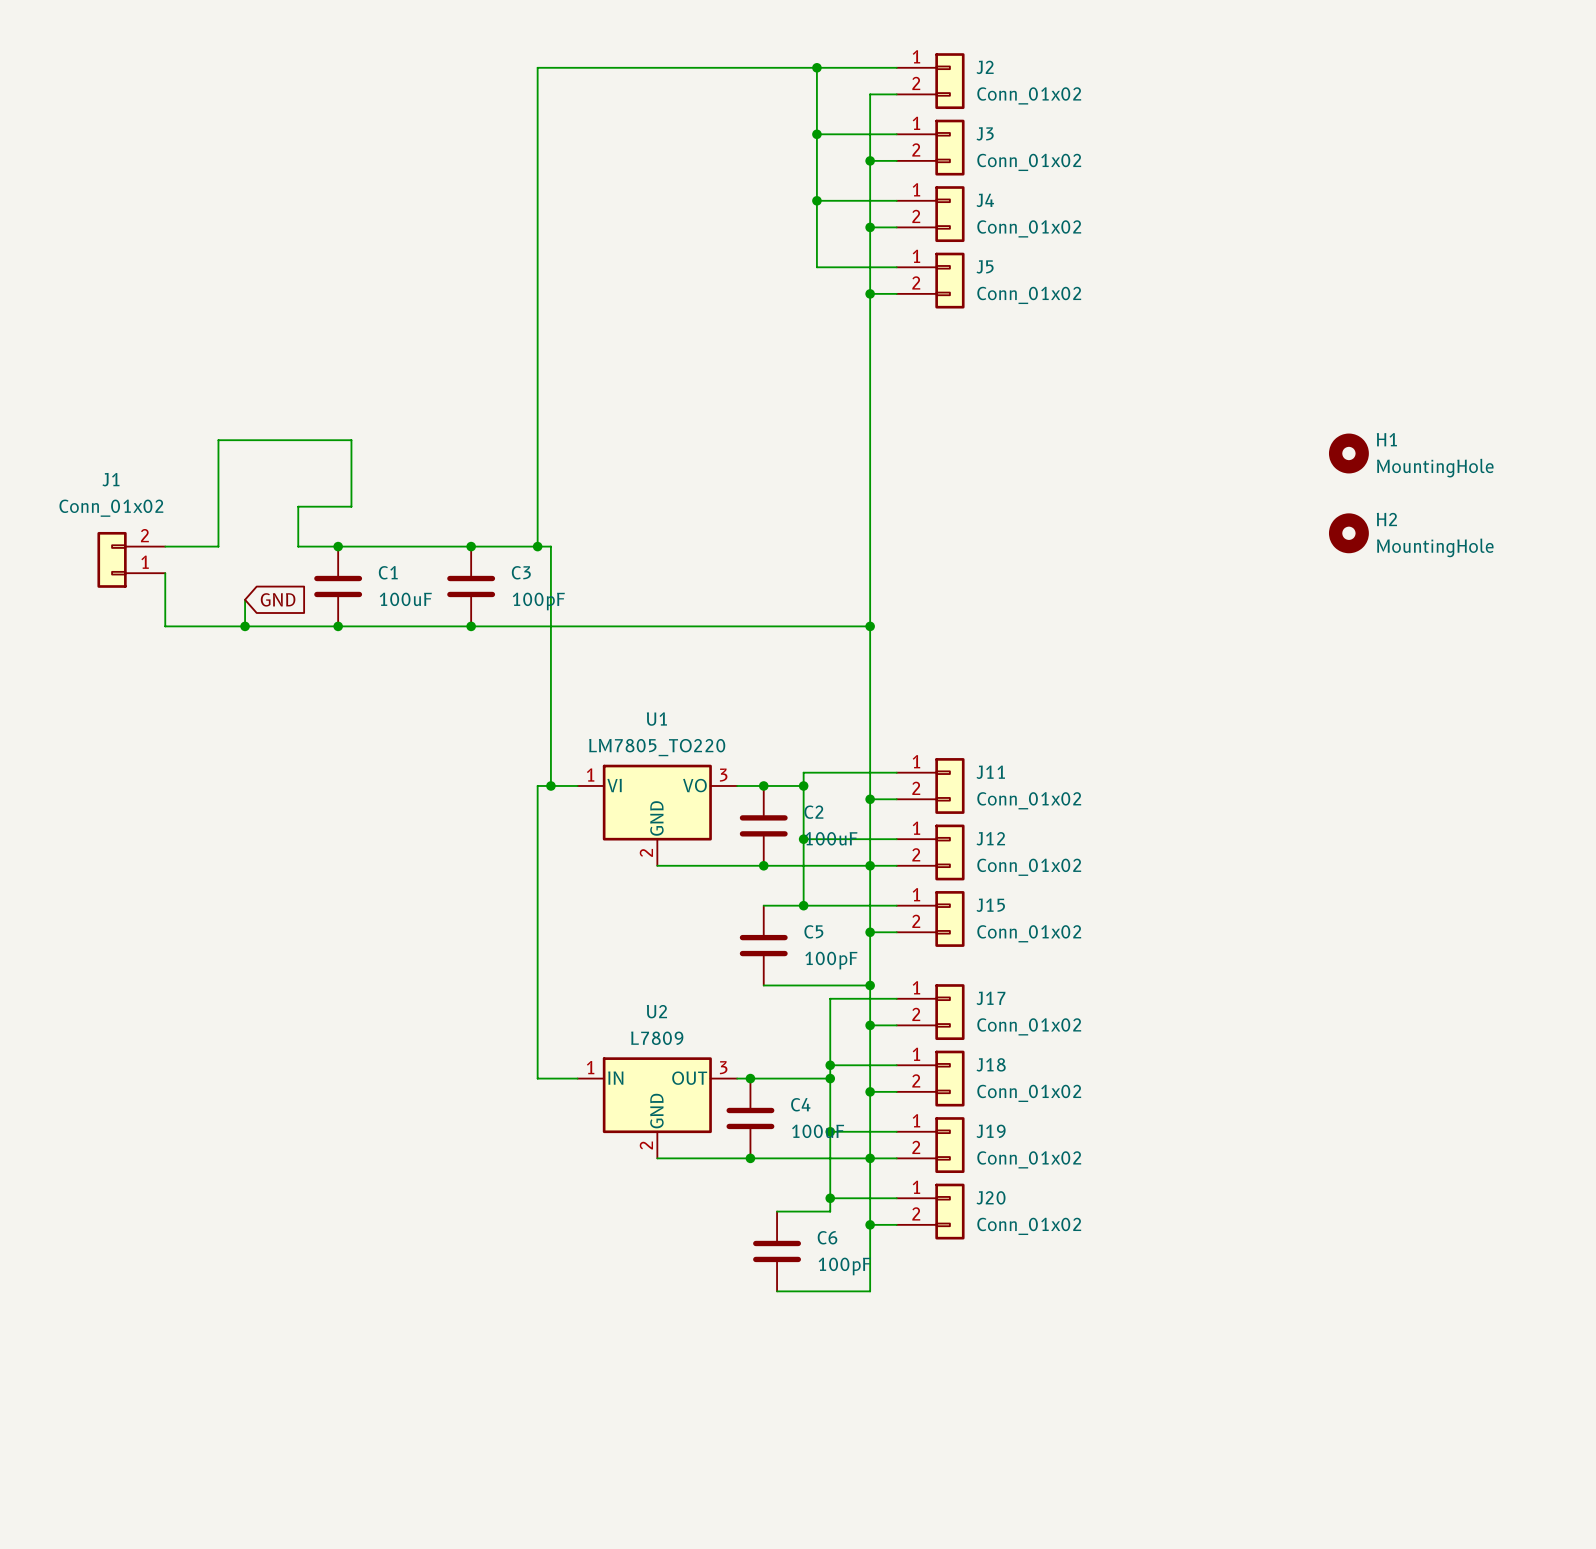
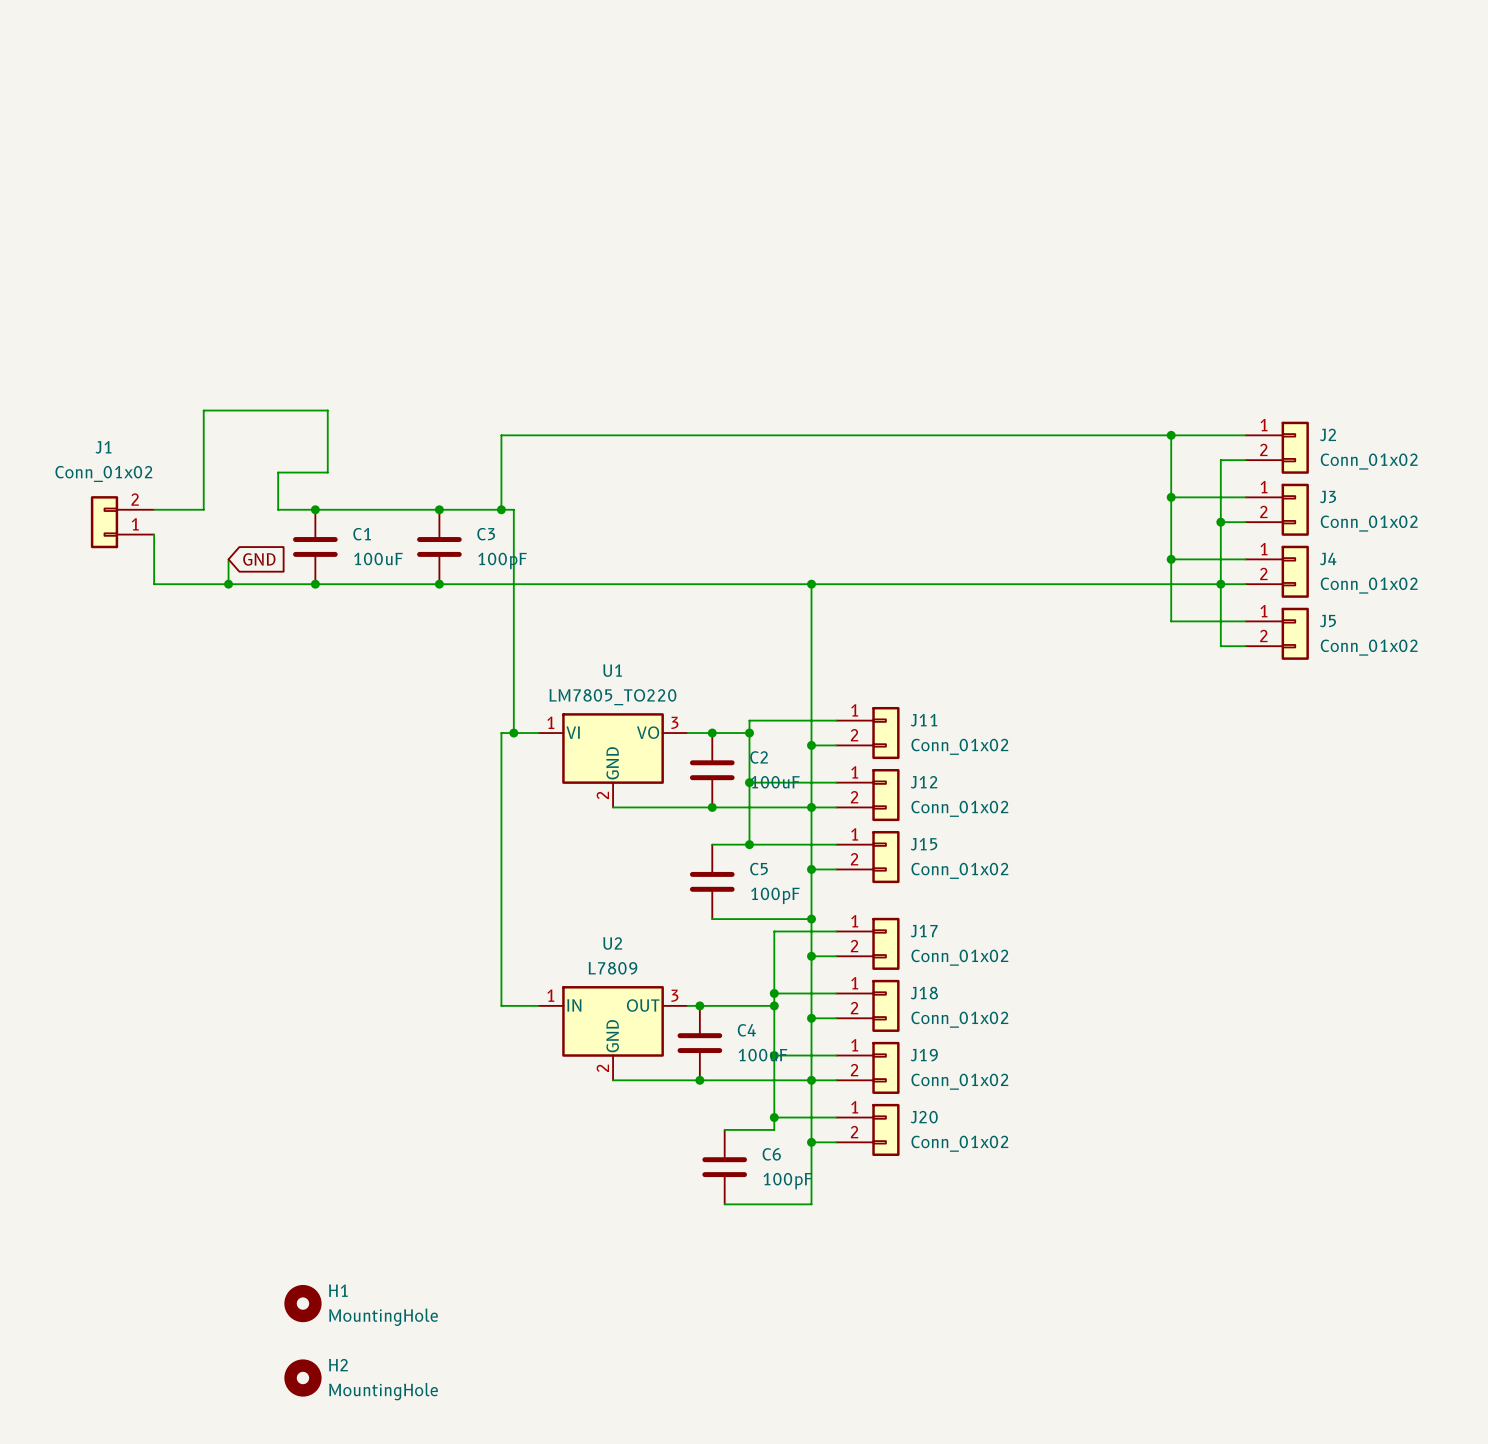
wire: (816, 67) (816, 267) (896, 267) -> none
junction: (816, 67) -> none
wire: (896, 67) (537, 67) (537, 466) -> (1245, 435) (501, 435)
J2 position: (930, 81) -> (1277, 447)
wire: (896, 94) (870, 94) (870, 626) -> (1245, 584) (811, 584)
wire: (816, 134) (896, 134) -> none
junction: (816, 134) -> none
J3 position: (930, 147) -> (1277, 509)
wire: (870, 160) (896, 160) -> none
junction: (870, 160) -> none
wire: (816, 200) (896, 200) -> none
junction: (816, 200) -> none
J4 position: (930, 214) -> (1277, 571)
wire: (870, 227) (896, 227) -> none
junction: (870, 227) -> none
J5 position: (930, 280) -> (1277, 633)
wire: (870, 293) (896, 293) -> none
junction: (870, 293) -> none
H1 position: (1348, 453) -> (302, 1303)
wire: none -> (1171, 435) (1171, 621) (1245, 621)
junction: none -> (1171, 435)
wire: none -> (1245, 460) (1220, 460) (1220, 646) (1245, 646)
wire: none -> (1171, 497) (1245, 497)
junction: none -> (1171, 497)
H2 position: (1348, 533) -> (302, 1378)
wire: none -> (1220, 522) (1245, 522)
junction: none -> (1220, 522)
wire: none -> (1171, 559) (1245, 559)
junction: none -> (1171, 559)
junction: none -> (1220, 584)

